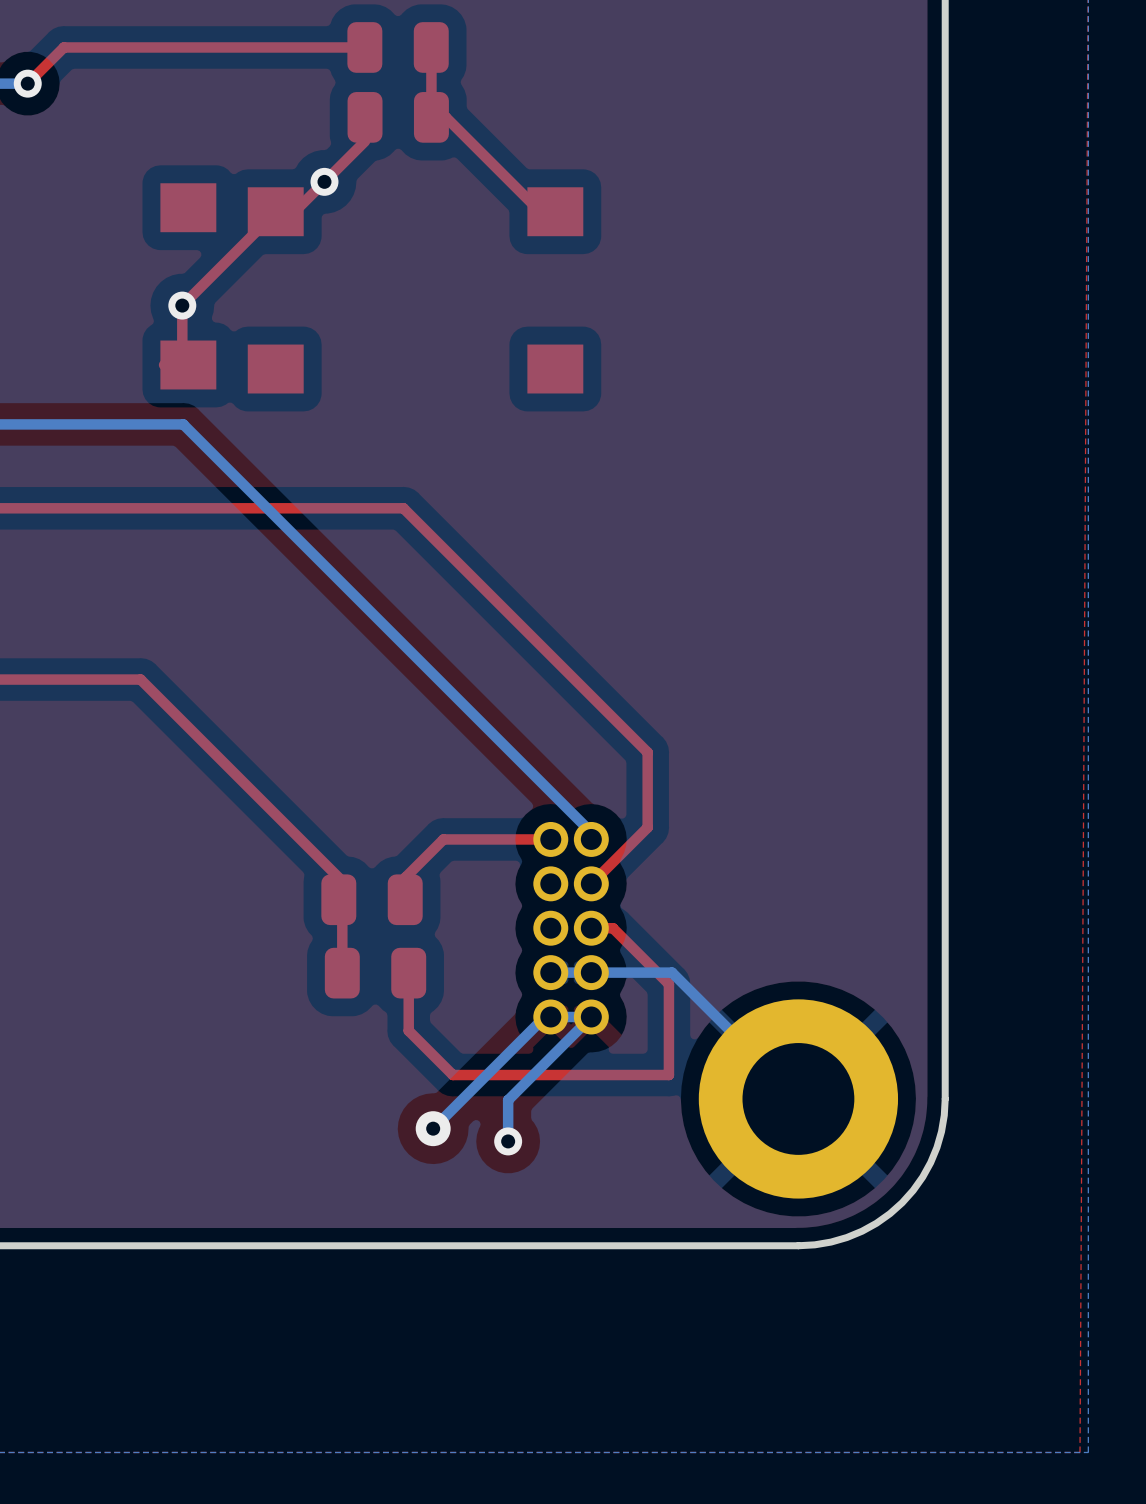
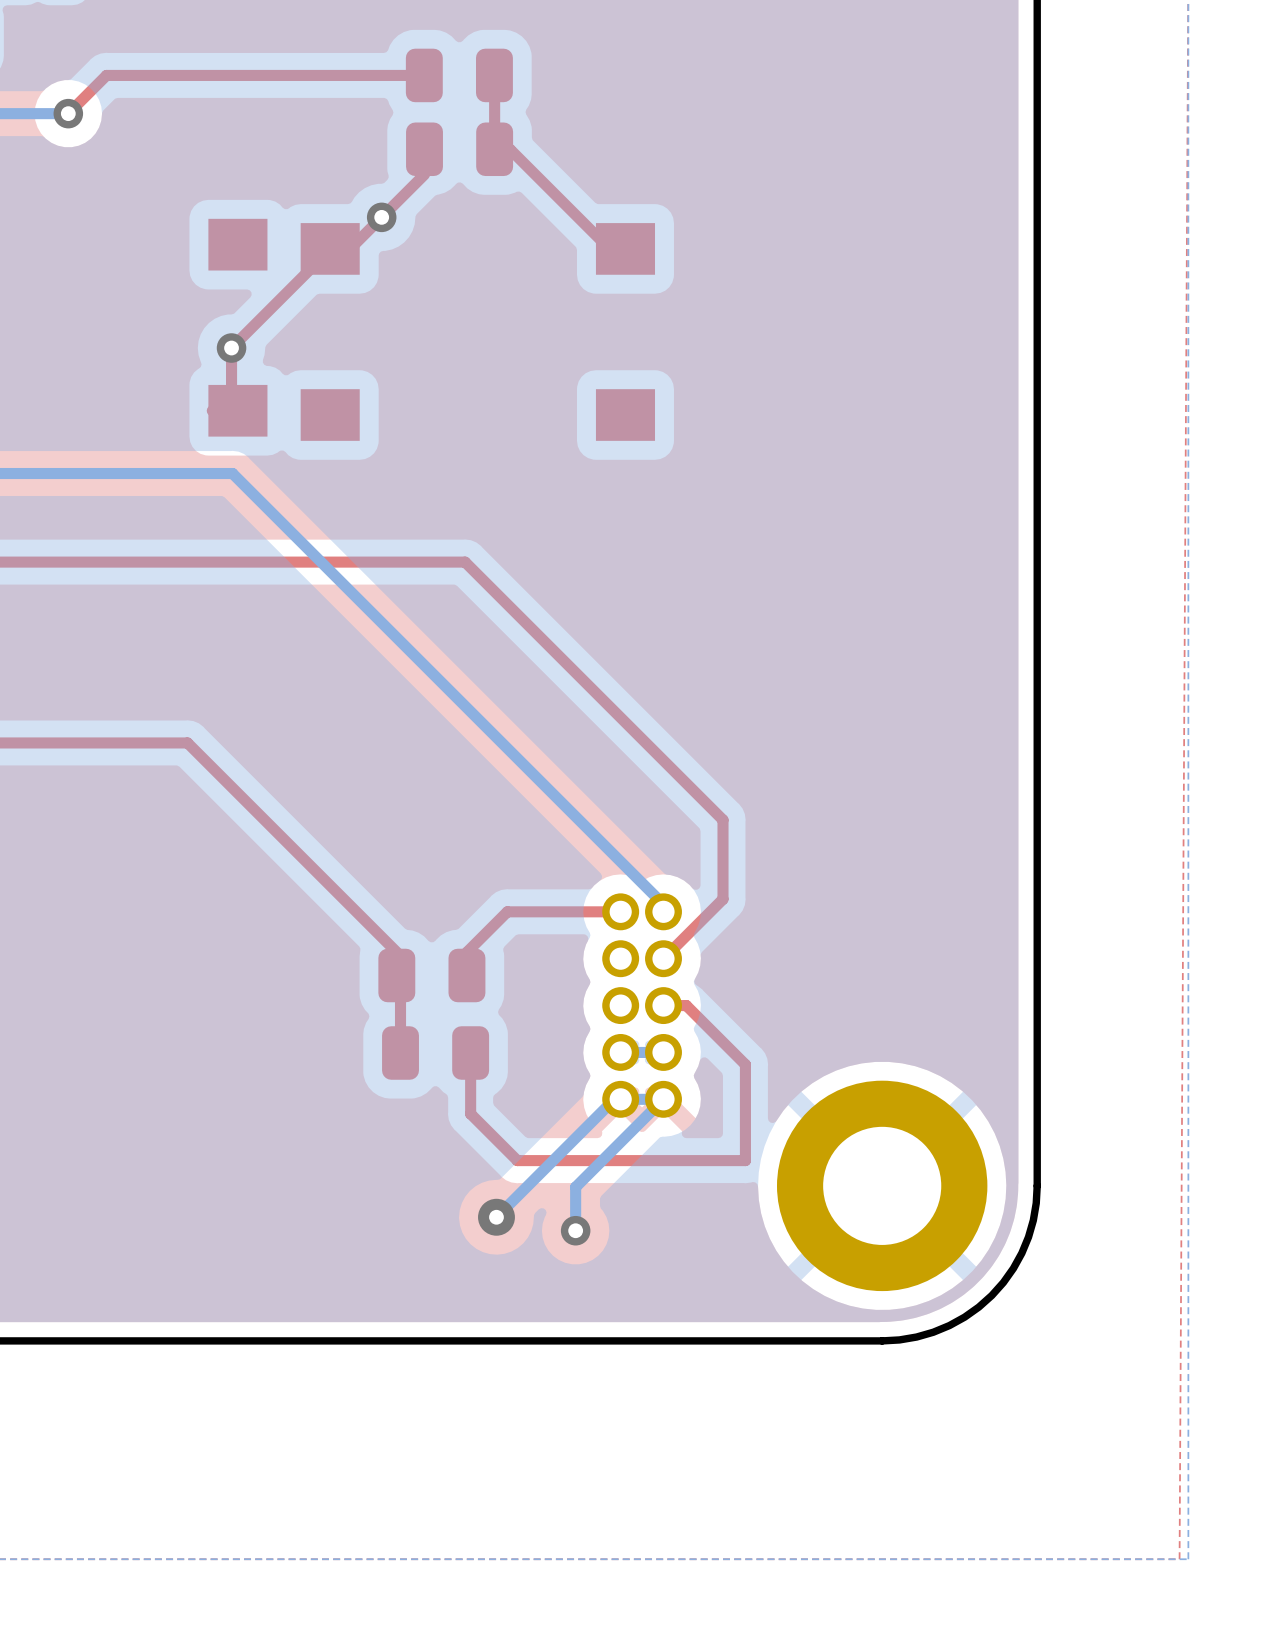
bottom track: (591, 972) (672, 972) (798, 1098) -> none

